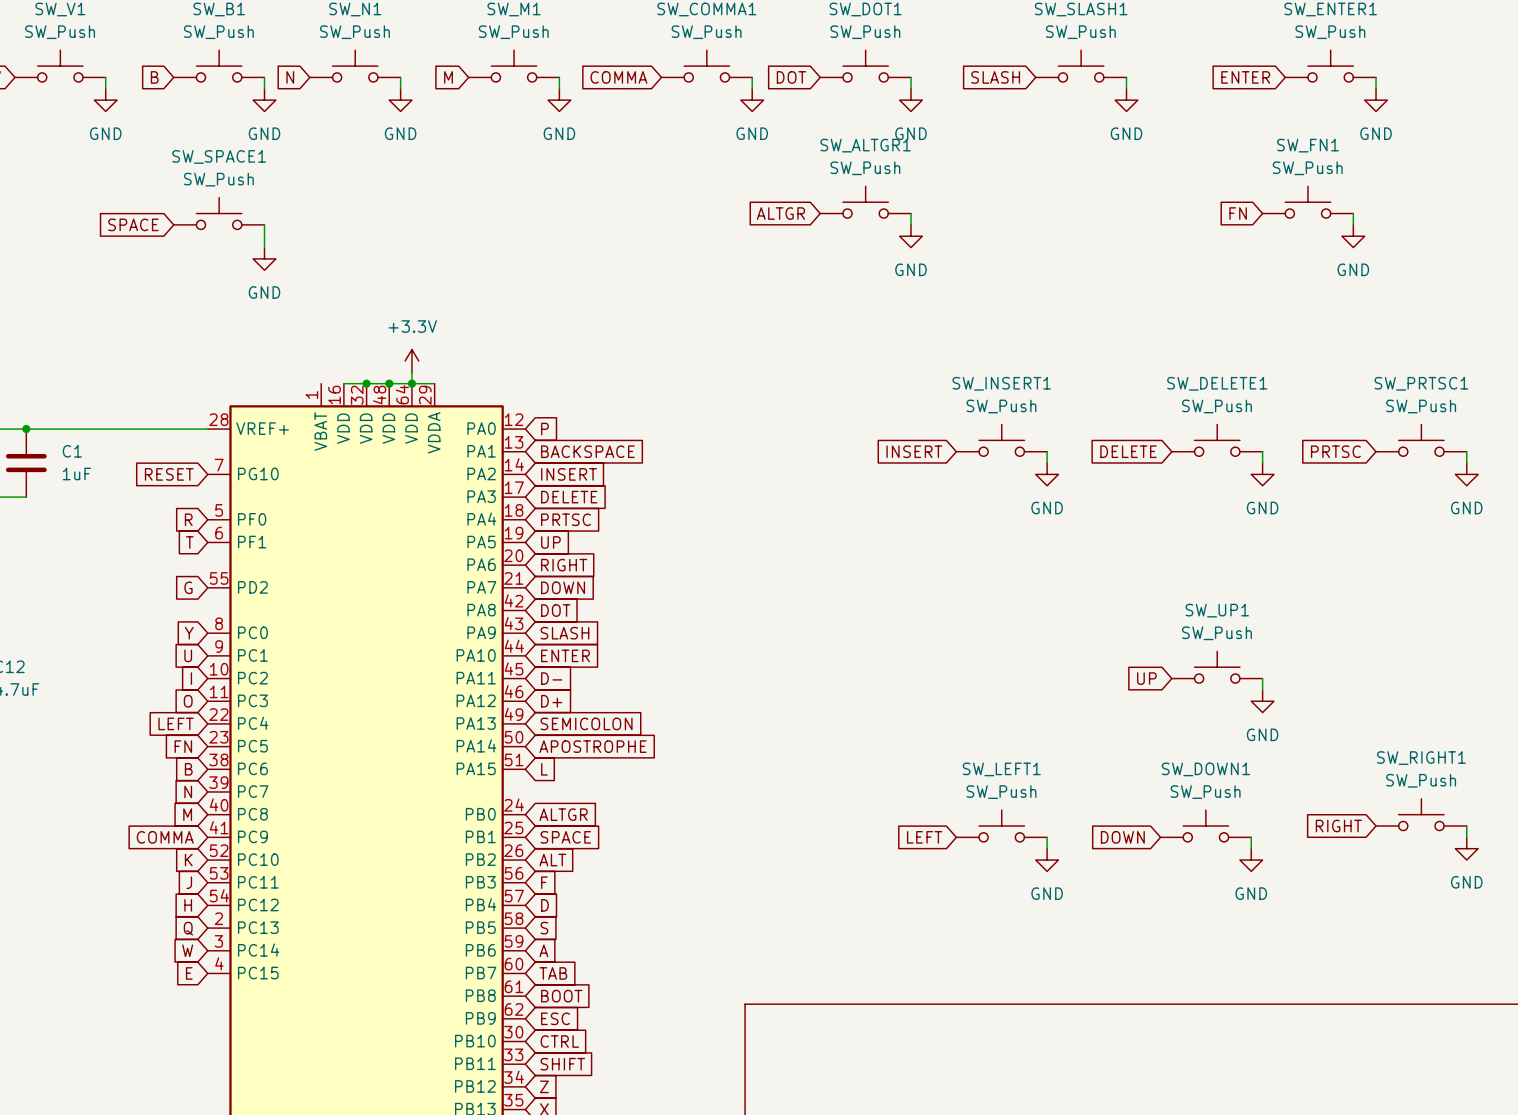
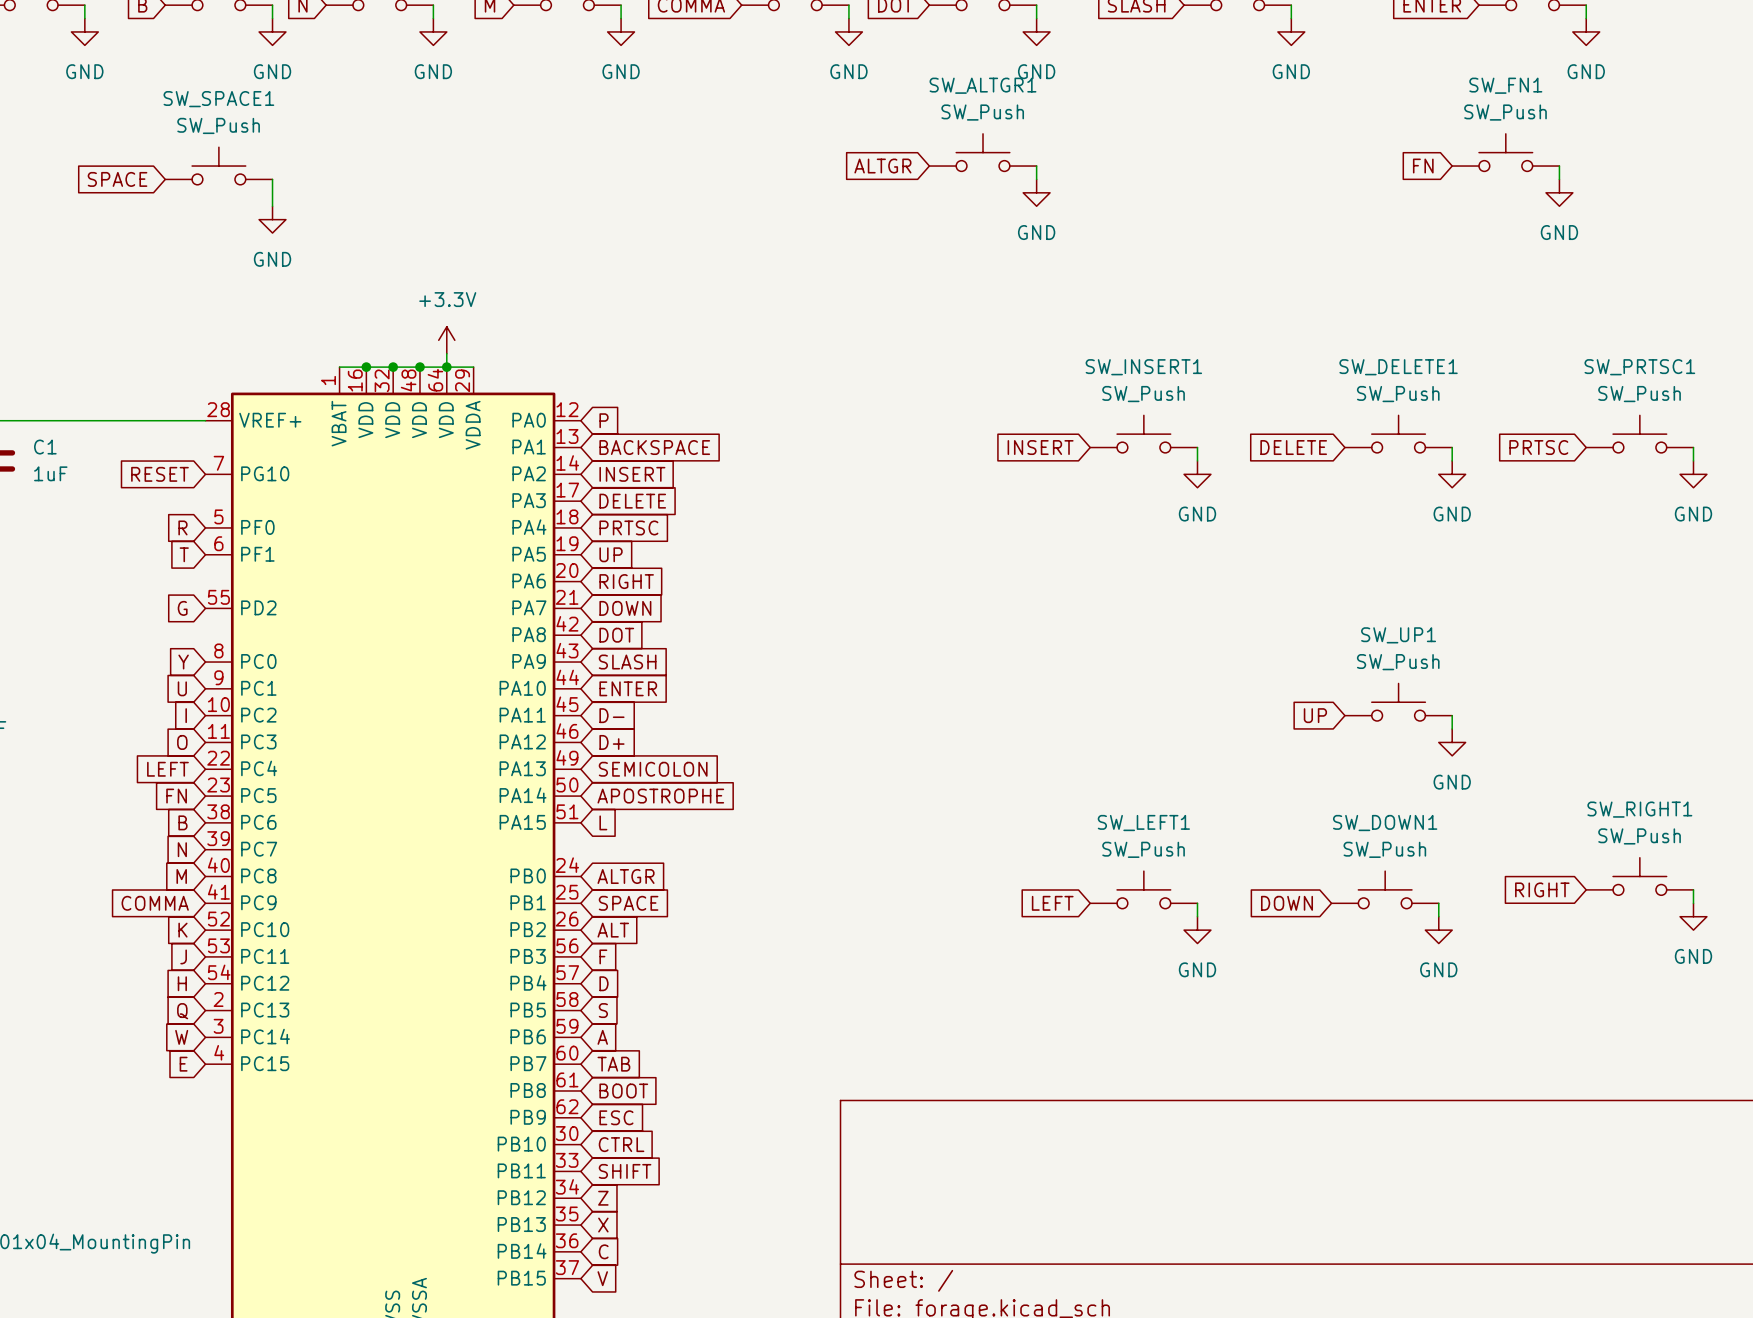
wire: none -> (339, 367) (366, 367)
junction: none -> (366, 367)

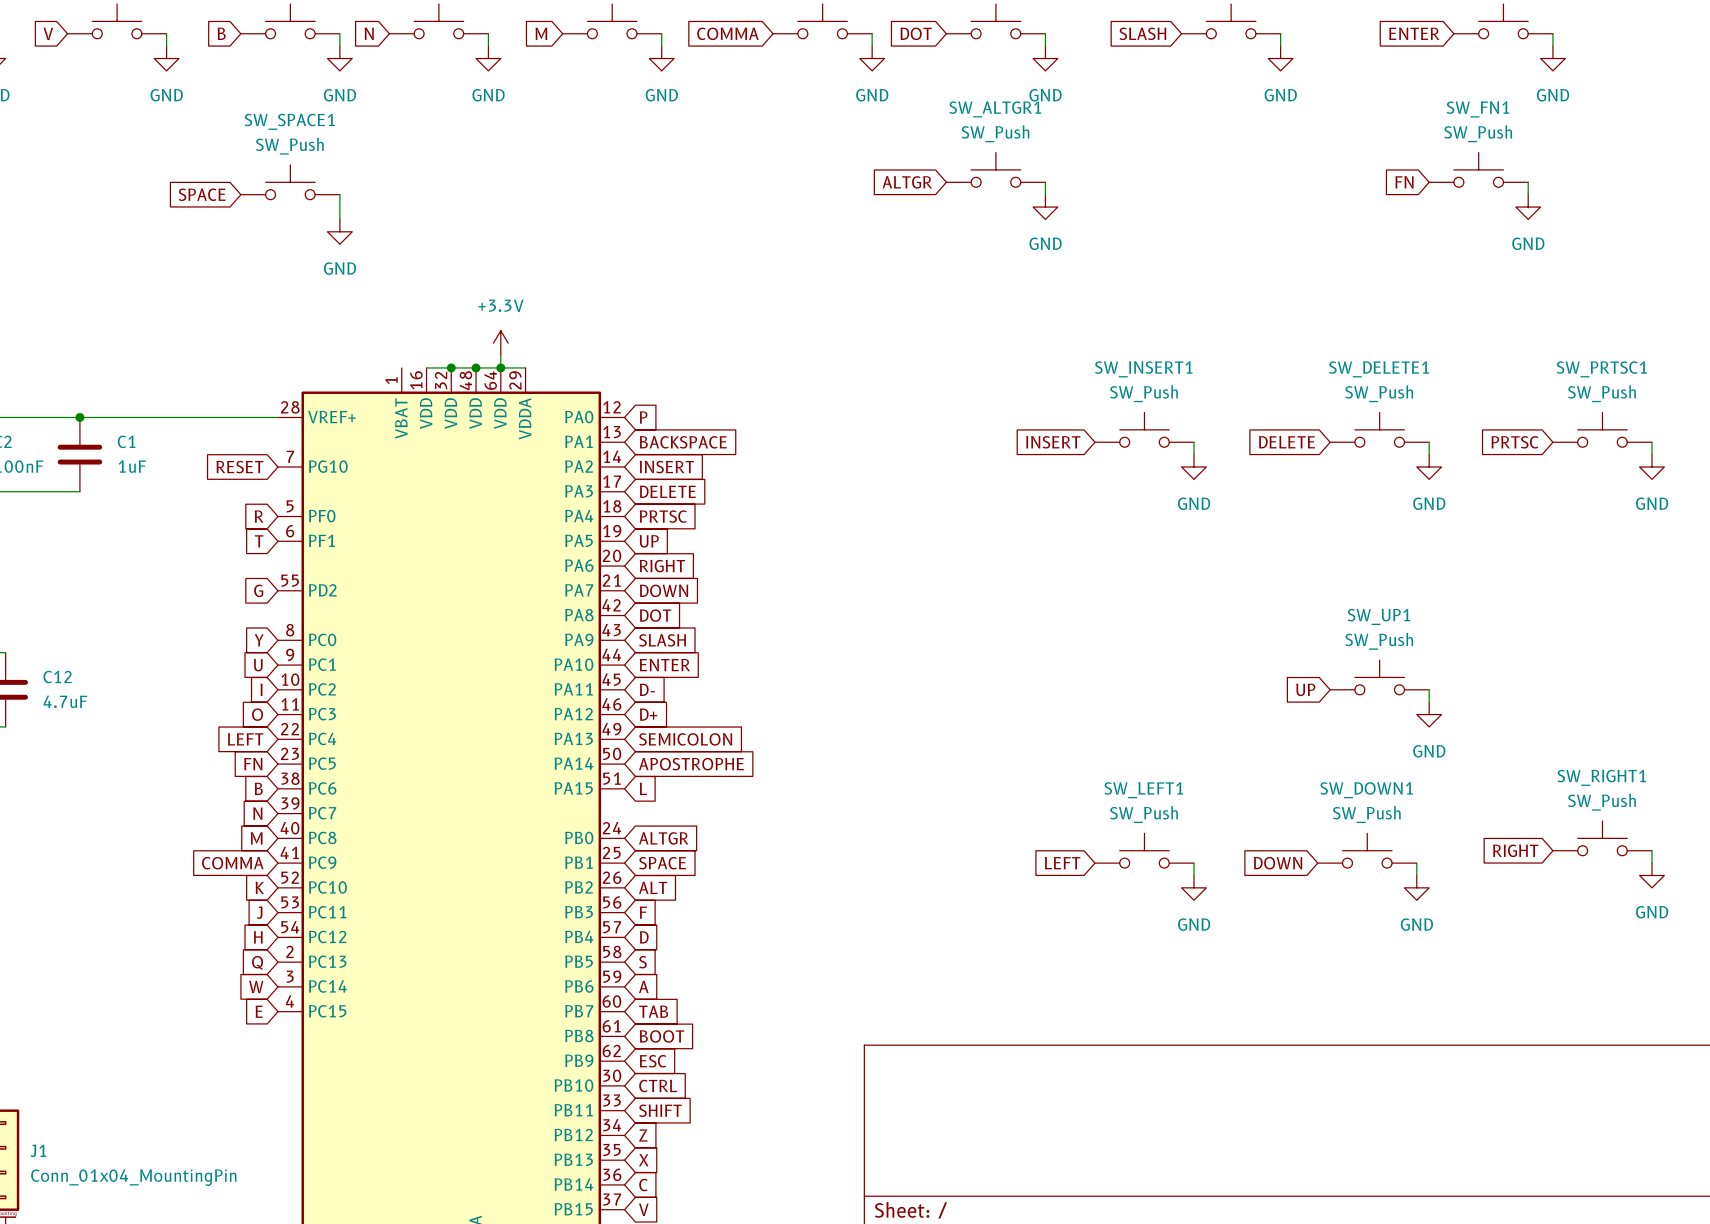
wire: (339, 367) (366, 367) -> none
junction: (366, 367) -> none

